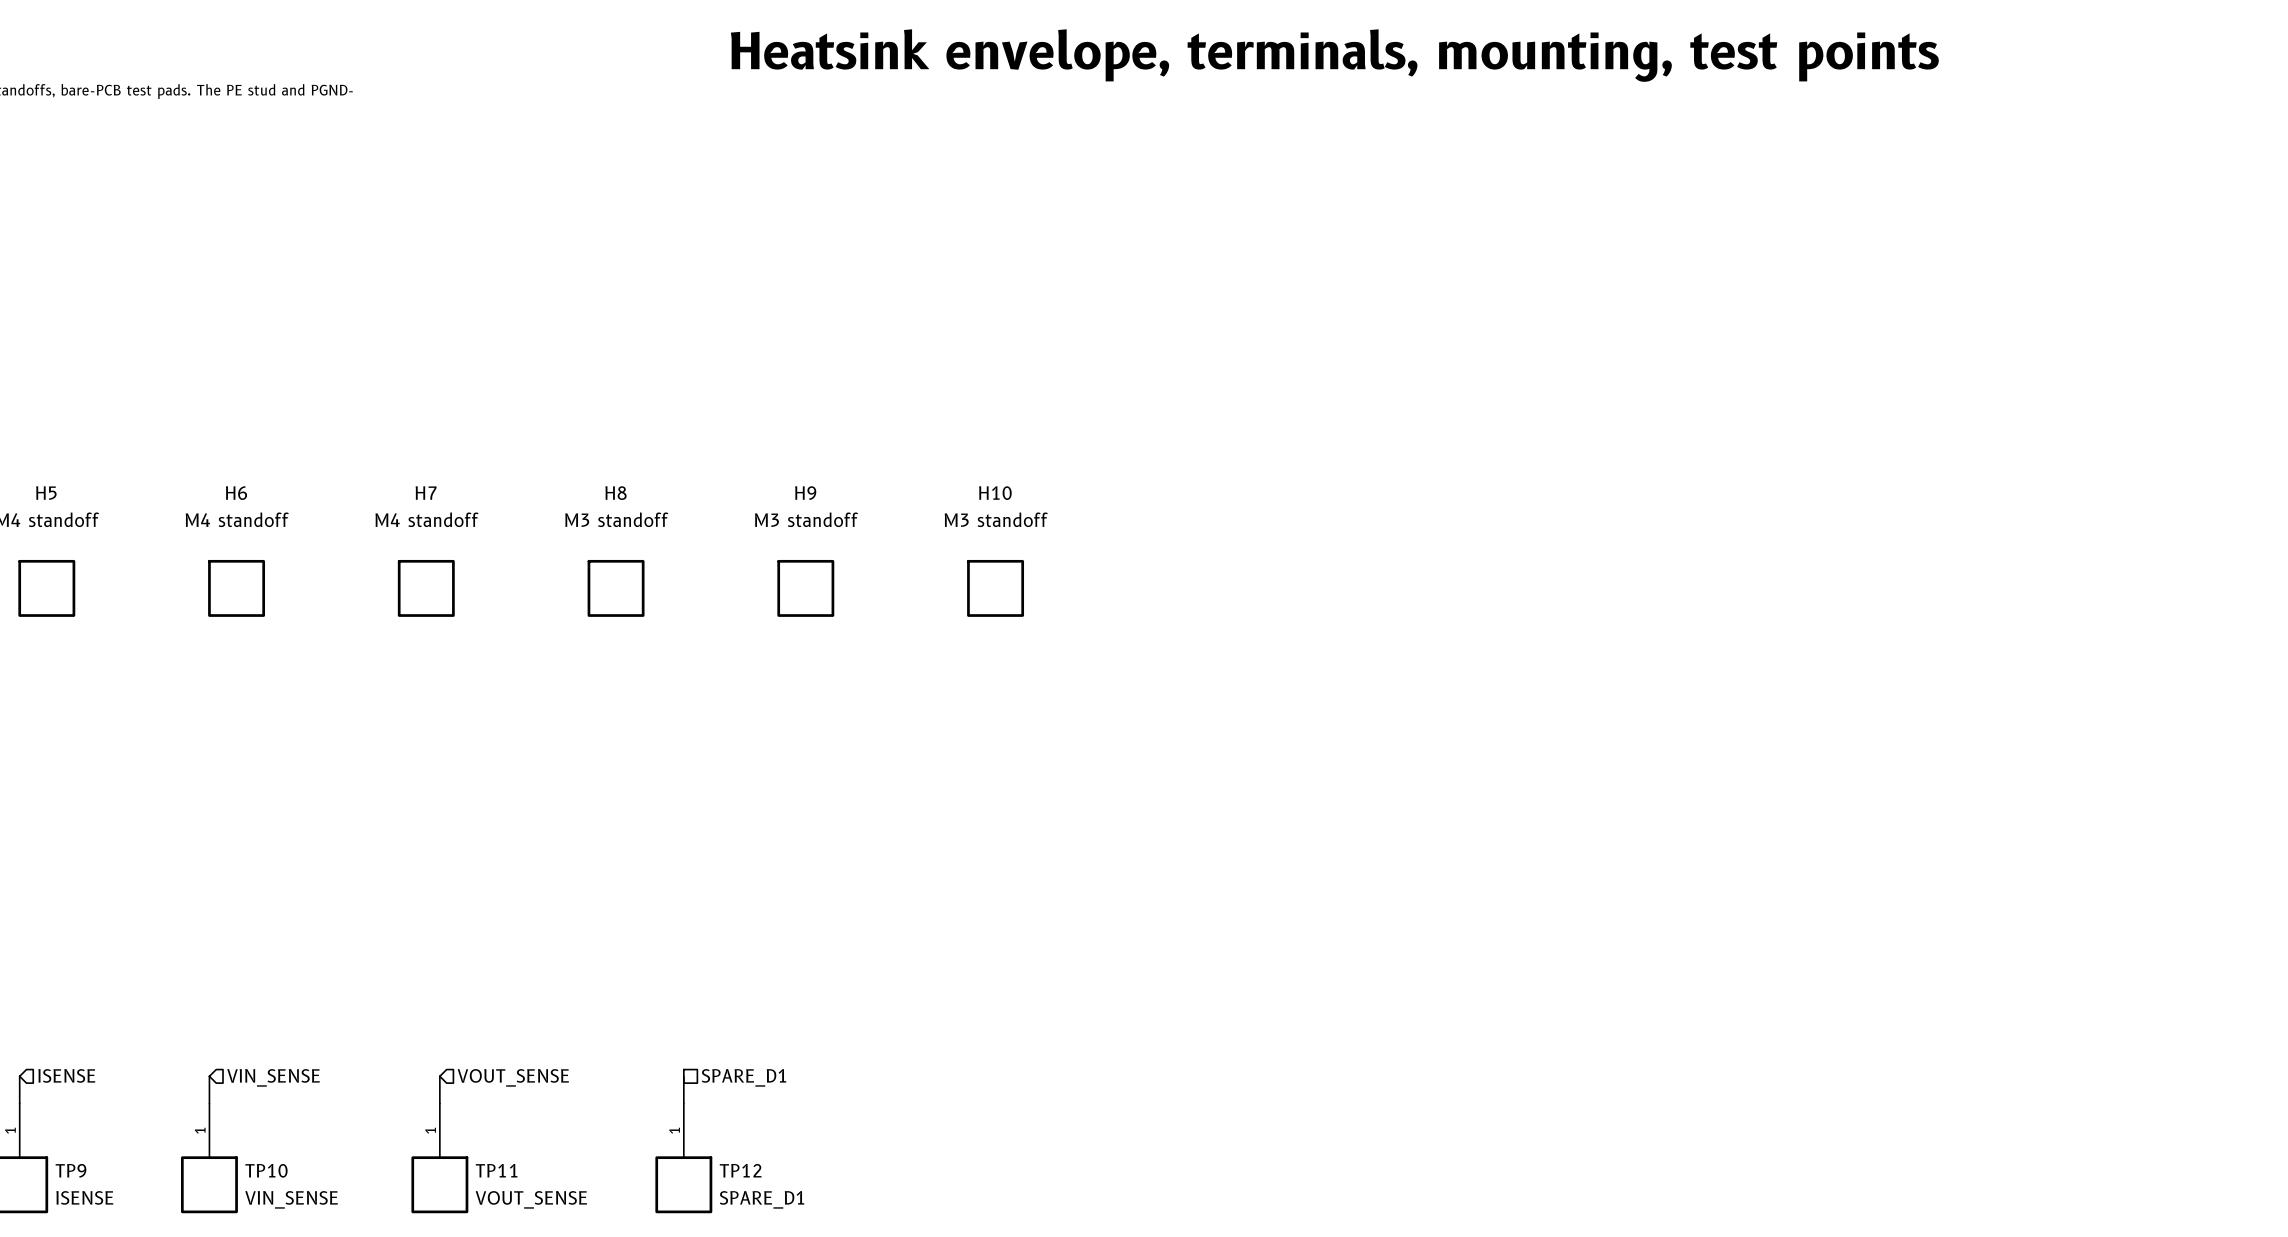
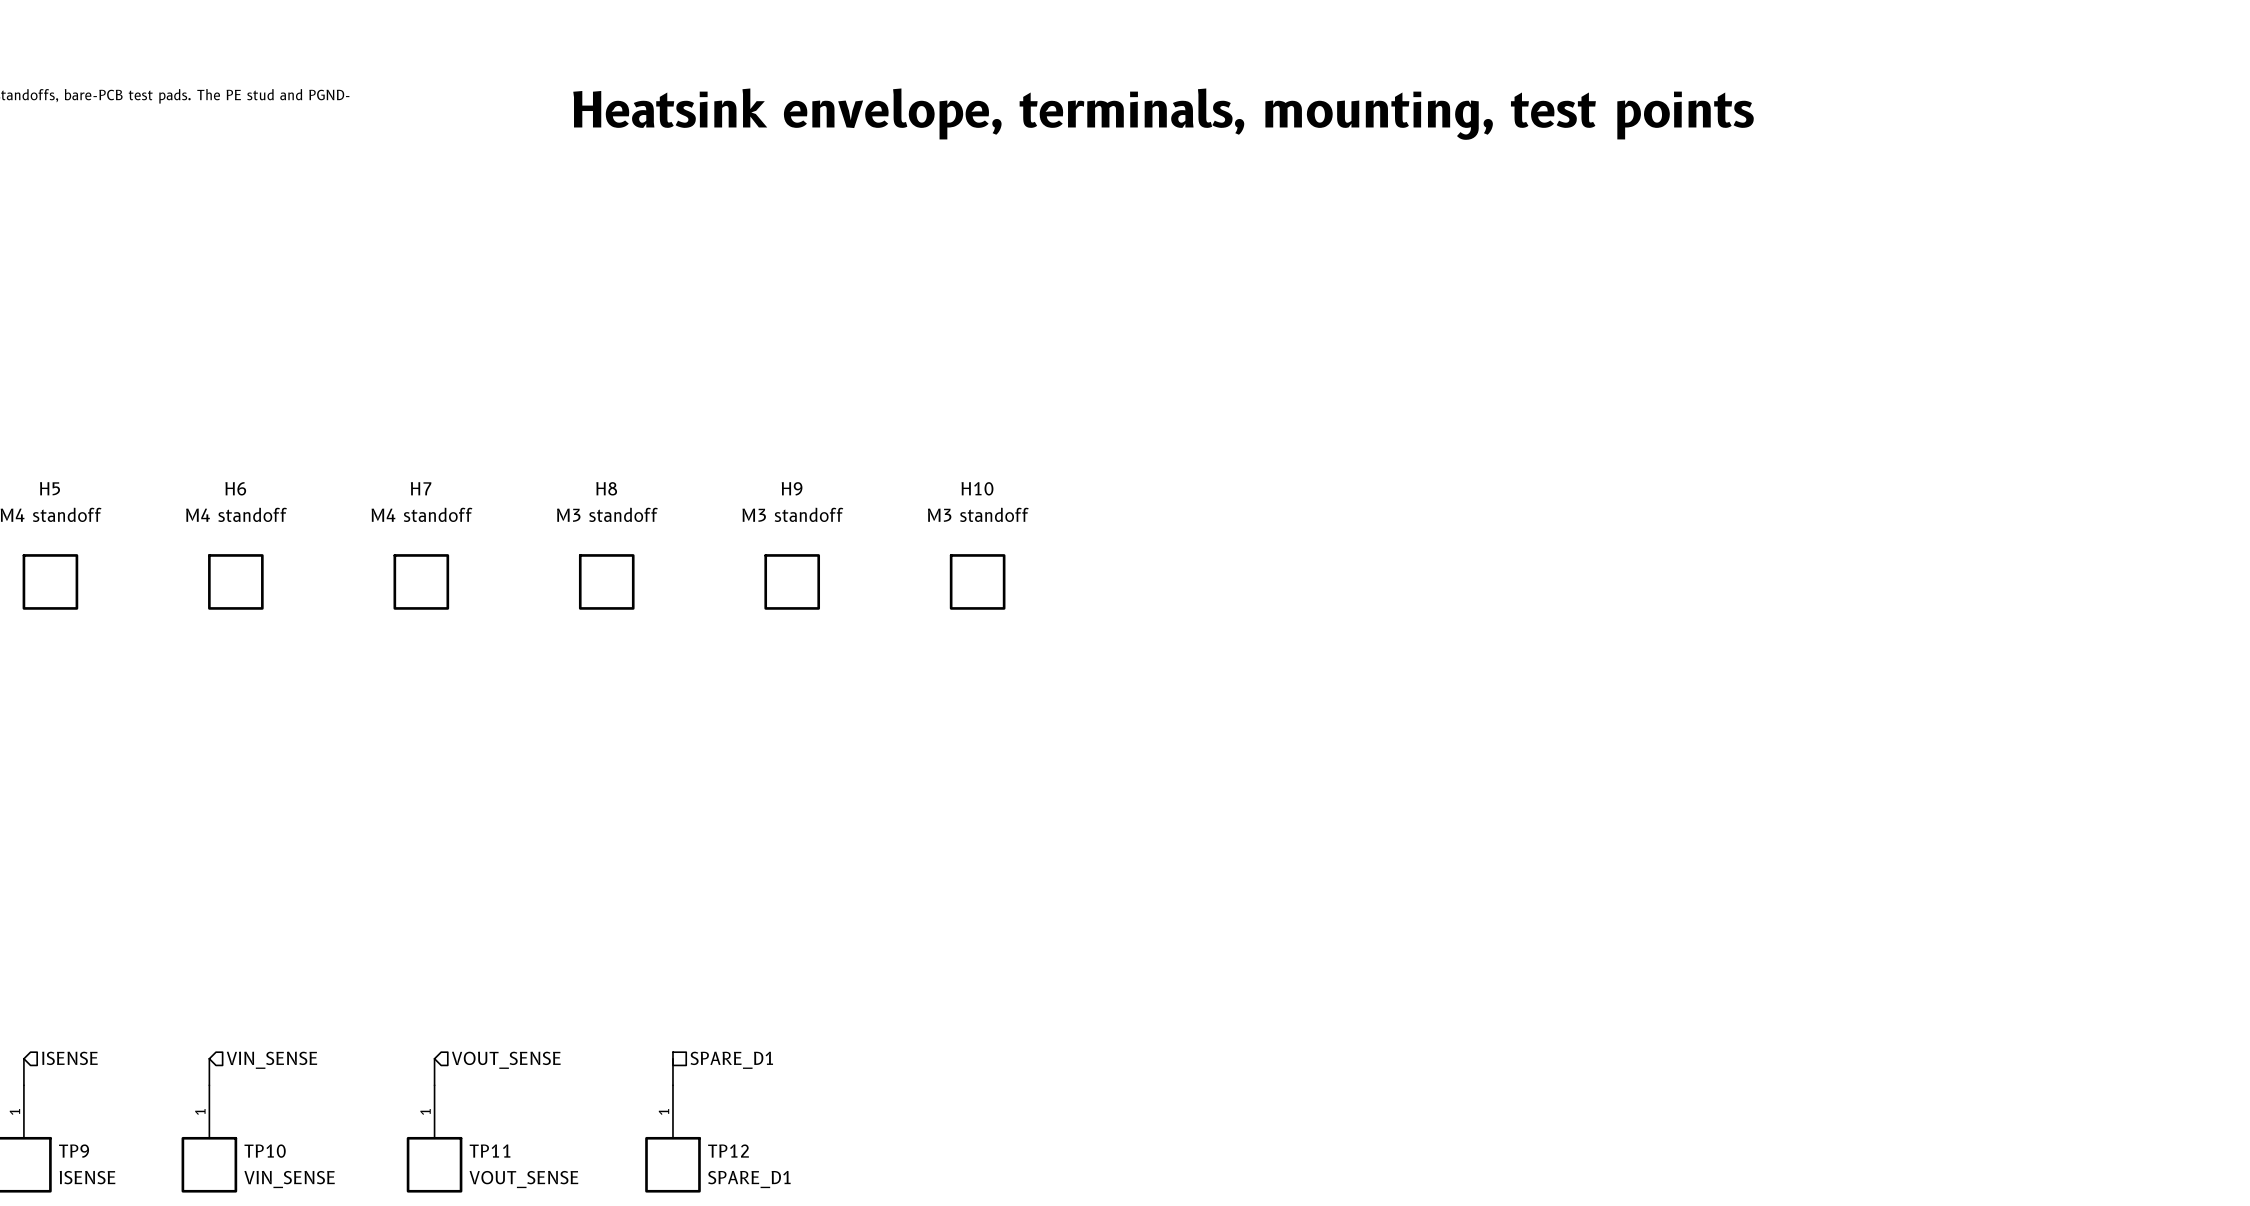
text position: Heatsink envelope, terminals, mounting, test points (1334, 55) -> Heatsink envelope, terminals, mounting, test points (1163, 114)

